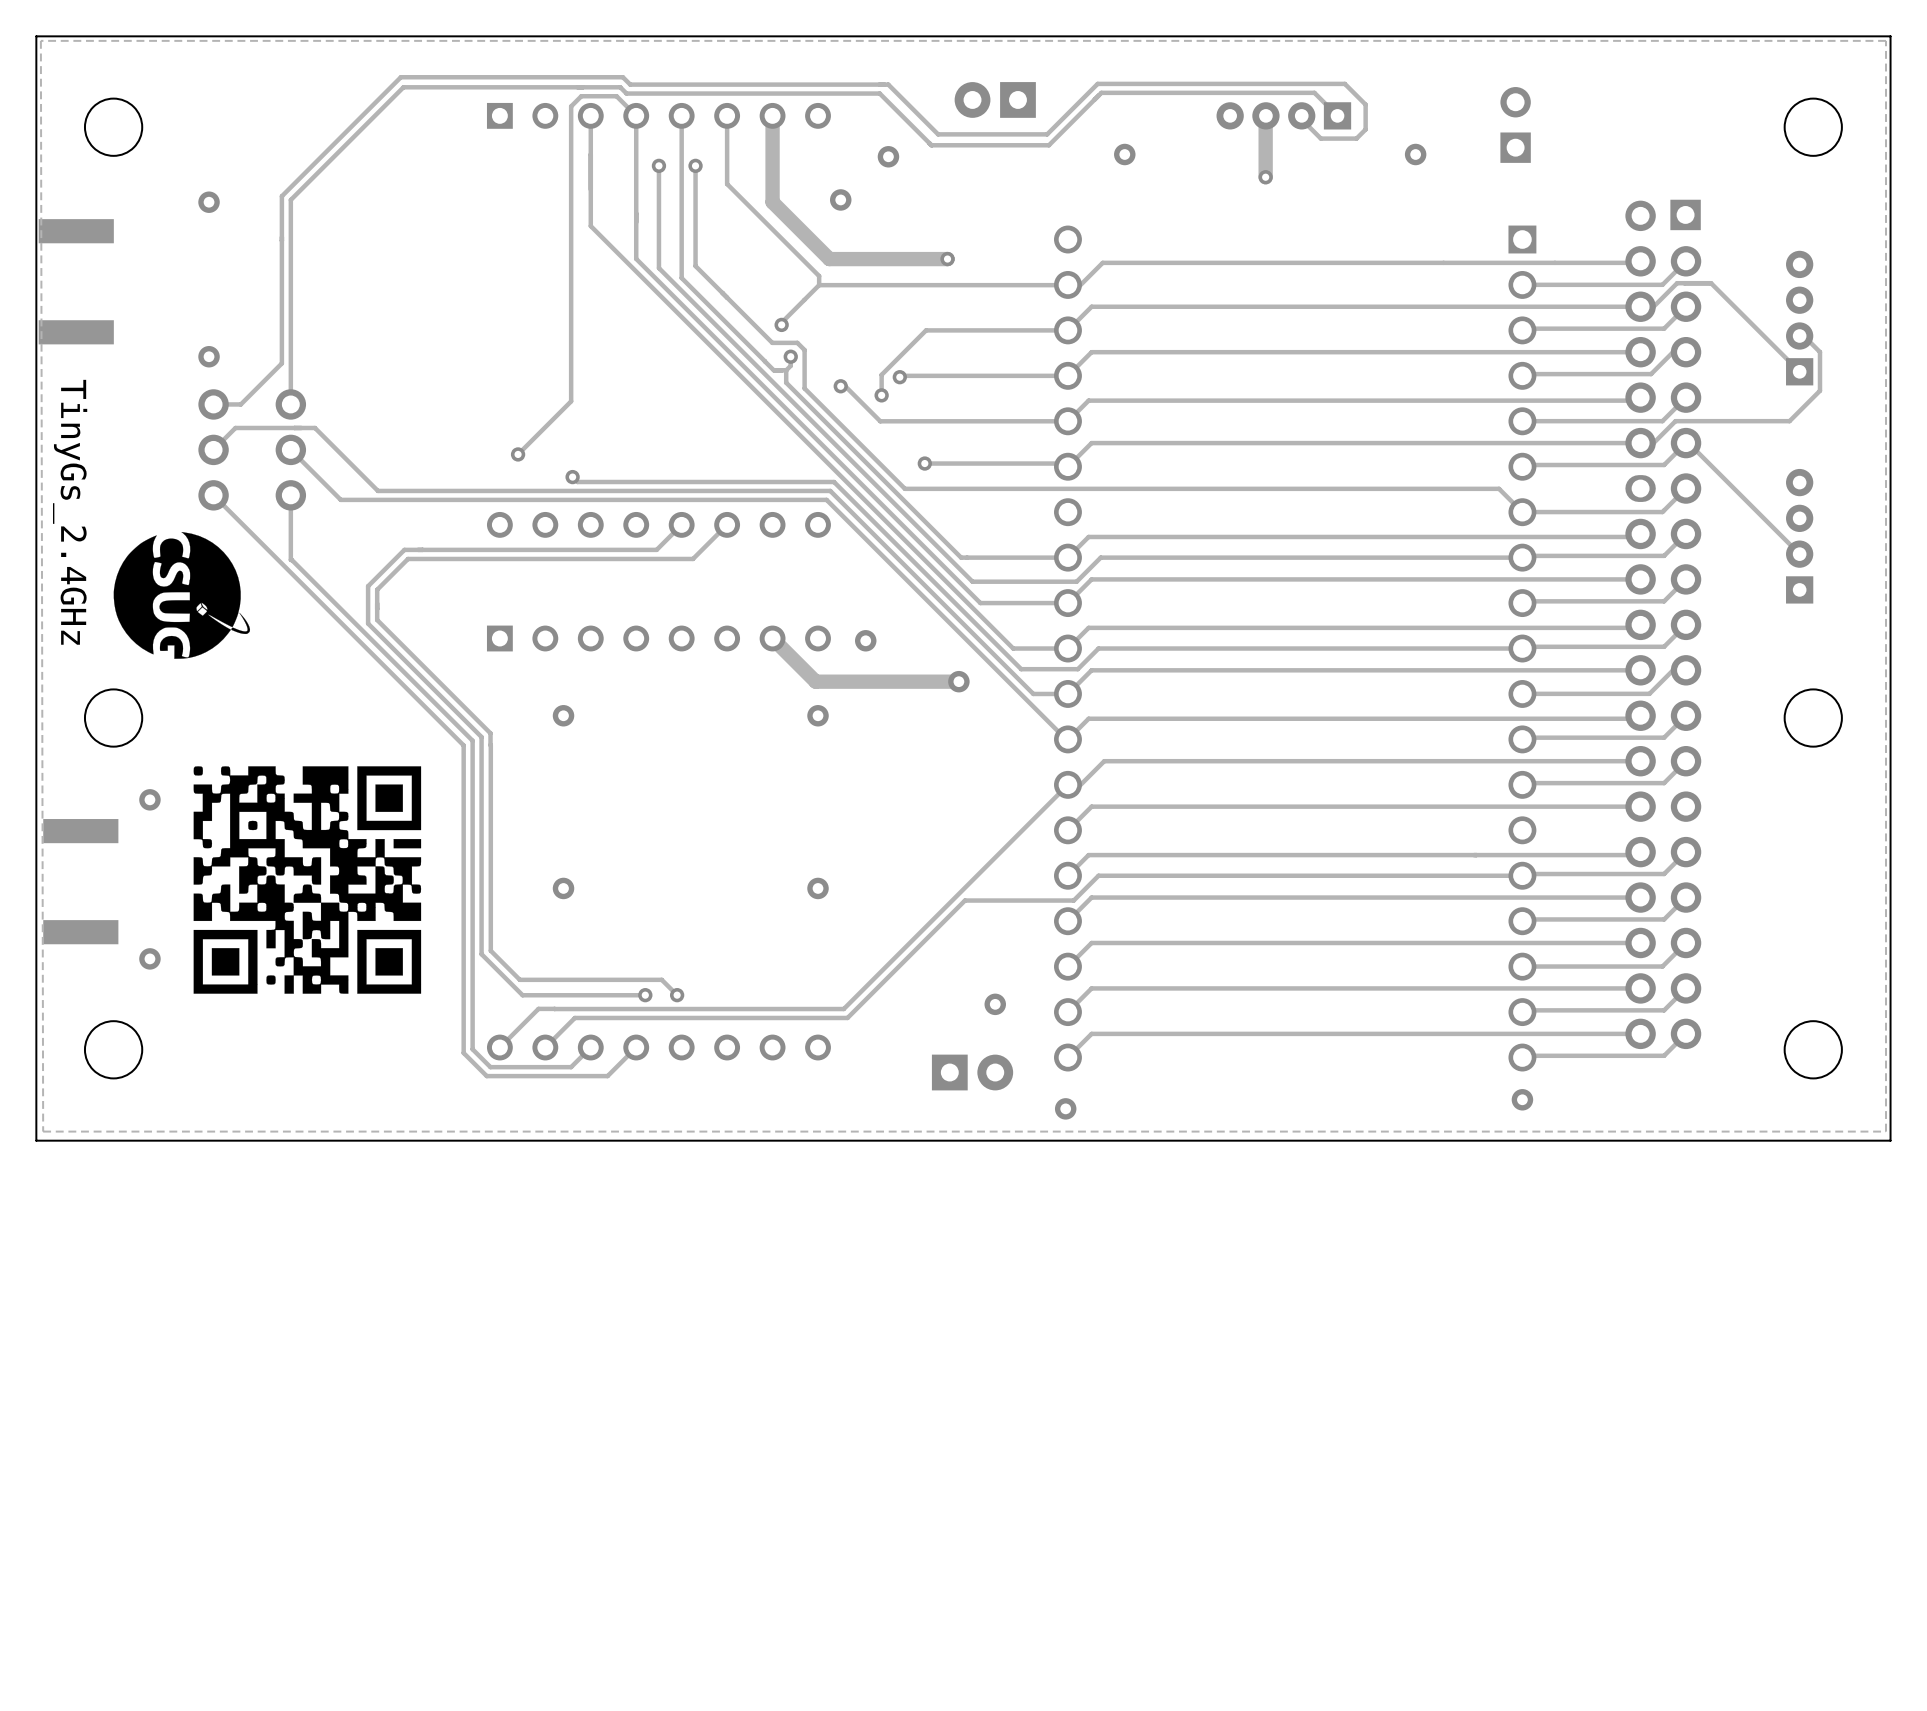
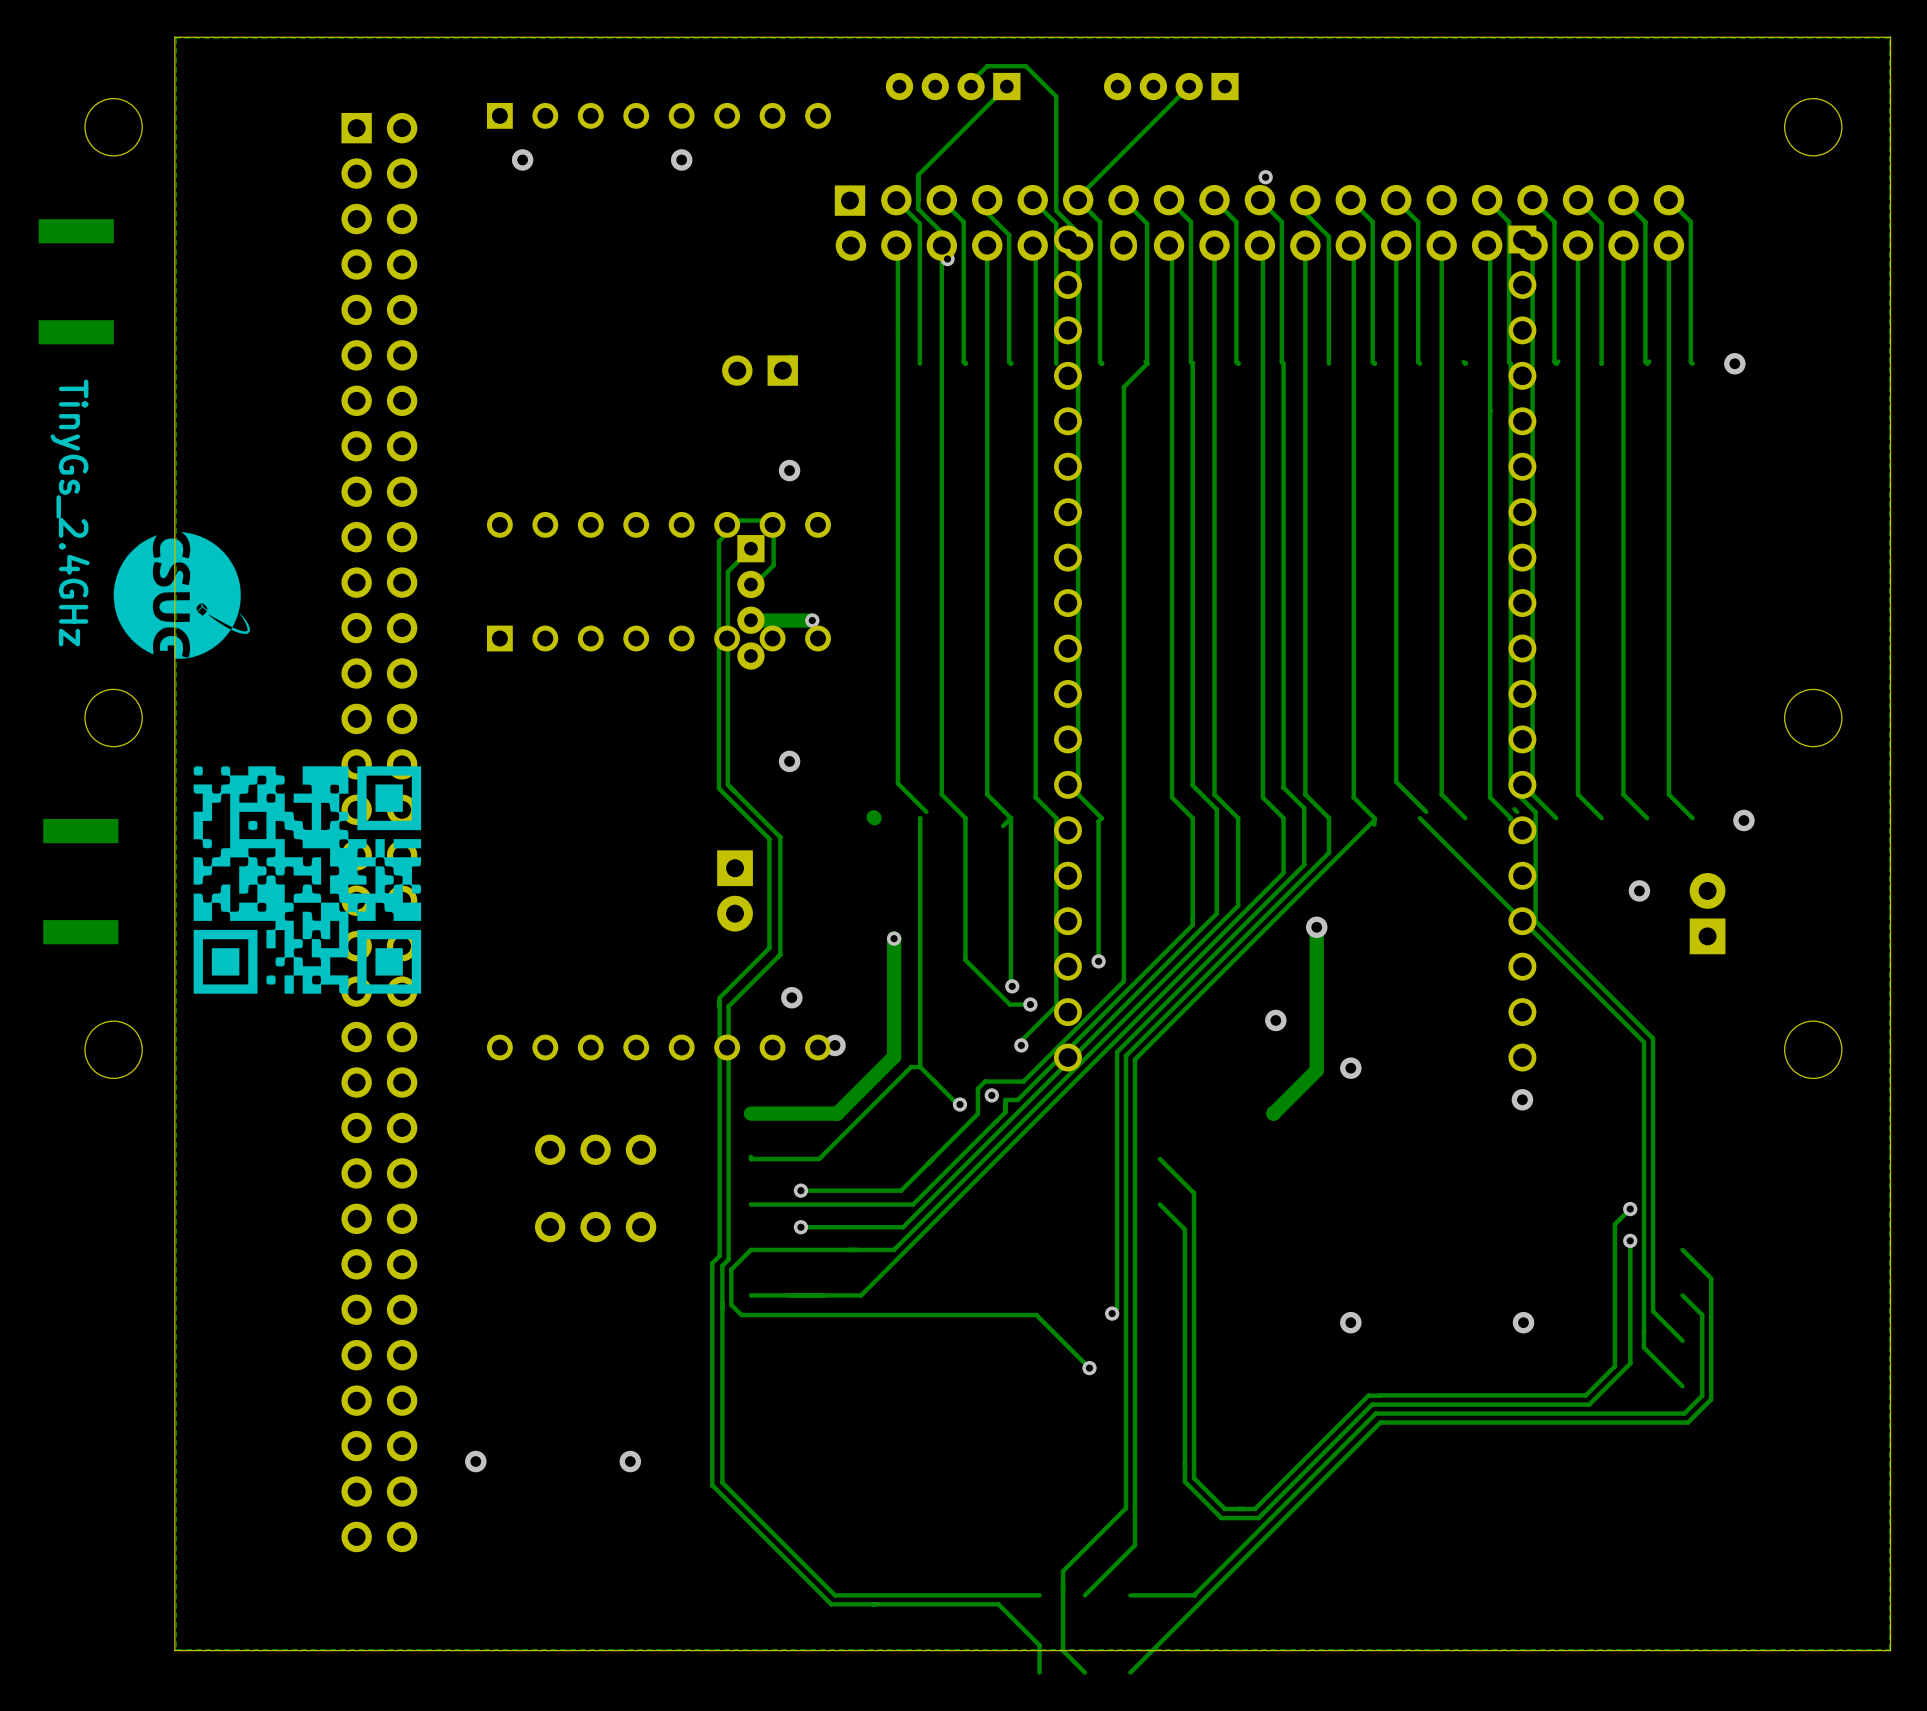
board edge: (1890, 37) (36, 36) (36, 1140) (1890, 1140) -> (1890, 37) (174, 37) (174, 1650) (1890, 1650) (1890, 1140)
zone outline: (1886, 40) (1886, 1131) (43, 1131) (40, 40) (1886, 40) -> (1889, 38) (1889, 1649) (176, 1649) (176, 38) (1889, 38)
part: none -> (953, 86)
track: none -> (971, 86) (971, 82) (987, 66) (1025, 66) (1056, 96) (1056, 210) (1078, 232) (1078, 794) (1101, 818) (1098, 821) (1098, 961)
track: none -> (1006, 86) (918, 175) (918, 209) (941, 232) (941, 794) (965, 818) (965, 960) (1009, 1004) (1030, 1004)
track: none -> (1189, 86) (1078, 197) (1078, 200) (1100, 222) (1100, 362) (1102, 363)
part: (995, 99) -> none
track: (590, 115) (590, 226) (1013, 648) (1067, 648) (1088, 627) (1637, 627) (1640, 624) -> none
track: (681, 115) (681, 278) (764, 361) -> none
track: (729, 115) (727, 115) (727, 184) (819, 276) (819, 285) -> none
track: (772, 115) (772, 202) (829, 259) (947, 259) -> none
track: (1265, 115) (1265, 177) -> none
part position: (1283, 115) -> (1171, 86)
track: (1301, 115) (1301, 119) (1320, 138) (1356, 138) (1365, 129) (1365, 104) (1344, 83) (1097, 83) (1047, 134) (938, 134) (888, 84) (630, 84) (622, 77) (400, 77) (281, 196) (281, 363) (240, 404) (213, 404) -> none
track: (1337, 115) (1314, 92) (1101, 92) (1048, 145) (931, 145) -> none
part: (1515, 124) -> none
track: (931, 145) (879, 93) (626, 93) (620, 87) (403, 87) (290, 199) (290, 404) -> none
via: (1124, 154) -> none
via: (1415, 154) -> none
via: (888, 156) -> none
via: none -> (522, 159)
track: (658, 165) (658, 268) (972, 581) (1076, 581) (1100, 557) (1522, 557) -> none
via: (658, 165) -> none
track: (695, 165) (695, 266) (772, 342) (797, 342) (804, 350) (804, 388) (904, 488) (1499, 488) (1522, 512) (1524, 510) -> none
via position: (695, 165) -> (681, 159)
via: (840, 199) -> none
track: none -> (896, 200) (919, 223) (919, 363)
track: none -> (941, 200) (963, 222) (963, 362) (966, 363)
track: none -> (987, 200) (987, 213) (1009, 235) (1009, 362) (1011, 363)
track: none -> (1032, 200) (1056, 223) (1056, 363)
track: none -> (1123, 200) (1147, 223) (1147, 363)
track: none -> (1169, 200) (1190, 222) (1190, 362) (1192, 363)
track: none -> (1214, 200) (1236, 222) (1236, 362) (1238, 363)
track: none -> (1259, 200) (1281, 222) (1283, 787) (1304, 808) (1304, 864) (1117, 1052) (1117, 1308) (1112, 1313)
track: none -> (1305, 200) (1305, 213) (1328, 236) (1328, 363)
track: none -> (1350, 200) (1372, 222) (1372, 362) (1375, 363)
track: none -> (1396, 200) (1418, 222) (1418, 362) (1419, 363)
track: none -> (1487, 200) (1509, 222) (1510, 787) (1535, 812) (1535, 921) (1653, 1038) (1653, 1311) (1682, 1340)
track: none -> (1532, 200) (1554, 222) (1554, 362) (1556, 363) (1558, 361)
track: none -> (1578, 200) (1601, 223) (1601, 363)
track: none -> (1623, 200) (1645, 222) (1645, 362) (1647, 363) (1649, 361)
track: none -> (1668, 200) (1690, 222) (1690, 362) (1692, 363)
via: (209, 202) -> none
part: none -> (1259, 222)
track: none -> (896, 245) (897, 247) (897, 783) (926, 811)
track: none -> (987, 245) (987, 794) (1010, 818)
track: none -> (1032, 245) (1035, 248) (1035, 797) (1056, 818) (1056, 1005) (1021, 1040) (1021, 1045)
track: none -> (1169, 245) (1172, 248) (1172, 797) (1192, 818) (1192, 925) (1017, 1099) (1005, 1099) (1005, 1112) (913, 1204) (750, 1204)
track: none -> (1214, 245) (1214, 794) (1238, 818) (1238, 905) (893, 1249) (750, 1249) (731, 1269) (731, 1304) (741, 1315) (1036, 1315) (1089, 1368)
track: none -> (1259, 245) (1262, 248) (1262, 797) (1283, 818) (1283, 872) (861, 1295) (750, 1295)
track: none -> (1305, 245) (1305, 794) (1329, 818) (1329, 852) (1126, 1055) (1126, 1508) (1063, 1571) (1063, 1650) (1084, 1672)
track: none -> (1350, 245) (1353, 248) (1353, 797) (1374, 818) (1374, 824)
track: none -> (1396, 245) (1396, 781) (1426, 811)
track: none -> (1441, 245) (1441, 794) (1465, 818)
track: none -> (1487, 245) (1490, 248) (1490, 797) (1509, 819)
track: none -> (1532, 245) (1532, 794) (1556, 818)
track: none -> (1578, 245) (1578, 794) (1601, 818)
track: none -> (1623, 245) (1623, 794) (1647, 818)
track: none -> (1668, 245) (1668, 794) (1692, 818)
track: (1640, 261) (1639, 262) (1102, 262) (1074, 291) -> none
track: (1686, 261) (1662, 284) (1522, 284) -> none
track: (819, 285) (781, 322) (781, 324) -> none
track: (1067, 285) (819, 285) -> none
track: (1686, 306) (1664, 328) (1524, 328) (1522, 330) -> none
part: (1799, 318) -> none
via: (781, 324) -> none
track: (1799, 336) (1803, 336) (1819, 352) (1819, 390) (1789, 421) (1675, 421) (1653, 443) (1091, 443) (1067, 466) (1064, 463) (924, 463) -> none
track: (1640, 352) (1091, 352) (1067, 375) -> none
track: (1686, 352) (1673, 352) (1651, 374) (1524, 374) (1522, 376) -> none
via: (209, 356) -> none
via: (790, 356) -> none
track: (764, 361) (773, 370) (786, 370) (786, 382) (961, 557) (1067, 557) (1088, 536) (1637, 536) (1640, 533) -> none
track: none -> (1145, 362) (1147, 363) (1123, 387) (1123, 981) (1023, 1081) (985, 1081) (977, 1088) (977, 1113) (901, 1190) (800, 1190)
track: none -> (1463, 362) (1465, 363)
track: none -> (1192, 363) (1192, 785) (1216, 809) (1216, 913) (903, 1227) (800, 1227)
via: none -> (1734, 363)
part: none -> (760, 370)
track: (1799, 371) (1711, 283) (1677, 283) (1653, 306) (1091, 306) (1067, 330) (926, 330) (881, 374) (881, 395) -> none
track: (1067, 375) (899, 377) -> none
via: (899, 377) -> none
track: (840, 386) (845, 386) (880, 421) (1067, 421) (1088, 400) (1637, 400) (1640, 397) -> none
via: (840, 386) -> none
via: (881, 395) -> none
track: (1686, 397) (1662, 421) (1522, 421) -> none
track: (213, 449) (235, 427) (314, 427) (377, 490) (830, 490) (1033, 693) (1067, 693) (1091, 670) (1640, 670) -> none
part: (213, 449) -> none
track: (290, 449) (340, 499) (826, 499) (1066, 739) -> none
part: (290, 449) -> none
track: (518, 454) (571, 401) (571, 106) (581, 96) (616, 96) (636, 115) (636, 258) (980, 603) (1067, 603) (1091, 579) (1640, 579) -> none
via: (518, 454) -> none
via: (924, 463) -> none
track: (1522, 467) (1524, 465) (1664, 465) (1686, 443) (1688, 443) (1799, 554) -> none
via: none -> (789, 470)
track: (572, 477) (577, 482) (834, 482) (1021, 669) (1077, 669) (1098, 648) (1522, 648) -> none
via: (572, 477) -> none
track: (1686, 488) (1662, 512) (1522, 512) -> none
track: (213, 495) (463, 745) (463, 1053) (486, 1076) (607, 1076) (636, 1047) -> none
track: (290, 495) (290, 559) (472, 740) (472, 1049) (490, 1067) (571, 1067) (590, 1047) -> none
track: (681, 524) (656, 549) (404, 549) (368, 586) (368, 623) (481, 737) (481, 954) (522, 995) (645, 995) -> none
track: (727, 524) (693, 558) (408, 558) (377, 589) (377, 620) (490, 733) (490, 950) (519, 979) (661, 979) (677, 995) -> none
track: (1686, 533) (1664, 555) (1524, 555) (1522, 557) -> none
part: (1799, 536) -> none
track: none -> (750, 548) (727, 571) (727, 784) (780, 837) (780, 954)
track: (1686, 579) (1664, 601) (1524, 601) (1522, 603) -> none
track: none -> (750, 584) (754, 584) (773, 565) (773, 529) (764, 520) (739, 520) (718, 541) (718, 788) (769, 838) (769, 948) (719, 997) (719, 1255) (712, 1263) (712, 1485) (831, 1604) (998, 1604) (1039, 1645) (1039, 1672)
part: none -> (750, 602)
track: none -> (750, 620) (812, 620)
via: none -> (812, 620)
part: (1663, 624) -> none
track: (1686, 624) (1664, 646) (1524, 646) (1522, 648) -> none
track: (773, 638) (815, 681) (958, 681) -> none
via: (865, 640) -> none
track: (1686, 670) (1673, 670) (1649, 693) (1522, 693) -> none
via: (958, 681) -> none
via: (563, 715) -> none
via position: (818, 715) -> (789, 761)
track: (1640, 715) (1637, 718) (1088, 718) (1067, 739) (1061, 739) -> none
track: (1686, 715) (1664, 737) (1524, 737) (1522, 739) -> none
track: (1640, 761) (1104, 761) (1074, 791) -> none
track: (1686, 761) (1664, 783) (1524, 783) (1522, 784) -> none
track: (1067, 784) (843, 1009) (554, 1009) -> none
via: (149, 799) -> none
track: (1640, 806) (1091, 806) (1067, 830) -> none
track: none -> (1514, 809) (1517, 811)
track: none -> (873, 817) (874, 818)
track: none -> (920, 818) (920, 1067)
track: none -> (1010, 818) (1003, 825)
track: none -> (1010, 818) (1012, 986)
track: none -> (1419, 818) (1644, 1042) (1644, 1331)
track: none -> (1374, 820) (1134, 1059) (1134, 1545) (1084, 1595)
via: none -> (1743, 820)
part: none -> (379, 832)
track: (1640, 852) (1637, 855) (1088, 855) (1067, 874) -> none
track: (1686, 852) (1664, 874) (1098, 875) (1073, 900) (965, 900) (847, 1017) (574, 1017) (545, 1047) -> none
via: (563, 888) -> none
via: (818, 888) -> none
via: none -> (1639, 890)
track: (1640, 897) (1091, 897) (1067, 921) -> none
track: (1686, 897) (1664, 919) (1524, 919) (1522, 921) (1524, 923) -> none
part: none -> (1707, 913)
track: none -> (1316, 927) (1316, 1070) (1273, 1112)
via: none -> (1316, 927)
track: none -> (894, 938) (894, 1056) (837, 1113) (750, 1113)
via: none -> (894, 938)
track: (1640, 942) (1091, 942) (1067, 966) -> none
track: (1686, 942) (1662, 966) (1522, 966) -> none
track: none -> (780, 954) (728, 1006) (728, 1259) (722, 1265) (722, 1482) (835, 1595) (1039, 1595)
via: (149, 958) -> none
via: none -> (1098, 961)
via: none -> (1012, 986)
track: (1640, 988) (1091, 988) (1067, 1012) -> none
track: (1686, 988) (1664, 1010) (1524, 1010) (1522, 1012) (1524, 1014) -> none
via: (645, 995) -> none
via: (677, 995) -> none
via: none -> (791, 997)
via: (995, 1004) -> none
via: none -> (1030, 1004)
track: (554, 1008) (538, 1008) (499, 1047) -> none
via: none -> (1275, 1020)
track: (1640, 1033) (1091, 1033) (1067, 1057) -> none
track: (1686, 1033) (1664, 1055) (1524, 1055) (1522, 1057) -> none
via: none -> (835, 1045)
via: none -> (1021, 1045)
track: none -> (920, 1067) (911, 1067) (819, 1159) (750, 1159) (750, 1156)
track: none -> (920, 1067) (957, 1104) (959, 1104)
via: none -> (1350, 1068)
part rotation: 0° (972, 1072) -> 90° clockwise (735, 890)
part position: (972, 1072) -> (735, 890)
via: none -> (991, 1095)
via: none -> (959, 1104)
via: (1065, 1108) -> none
part: none -> (595, 1149)
track: none -> (1159, 1159) (1194, 1193) (1194, 1478) (1224, 1508) (1255, 1508) (1368, 1395) (1585, 1395) (1614, 1366) (1614, 1224) (1630, 1209)
via: none -> (800, 1190)
track: none -> (1159, 1204) (1184, 1229) (1184, 1481) (1221, 1518) (1258, 1518) (1372, 1404) (1589, 1404) (1630, 1363) (1630, 1240)
via: none -> (1630, 1209)
part: none -> (595, 1227)
via: none -> (800, 1227)
via: none -> (1630, 1240)
track: none -> (1682, 1249) (1711, 1278) (1711, 1399) (1688, 1422) (1380, 1422) (1130, 1672)
track: none -> (1682, 1295) (1702, 1315) (1702, 1395) (1684, 1413) (1375, 1413) (1195, 1595) (1130, 1595)
via: none -> (1112, 1313)
via: none -> (1350, 1322)
via: none -> (1523, 1322)
track: none -> (1643, 1331) (1643, 1347) (1682, 1386)
via: none -> (1089, 1368)
via: none -> (475, 1461)
via: none -> (630, 1461)

